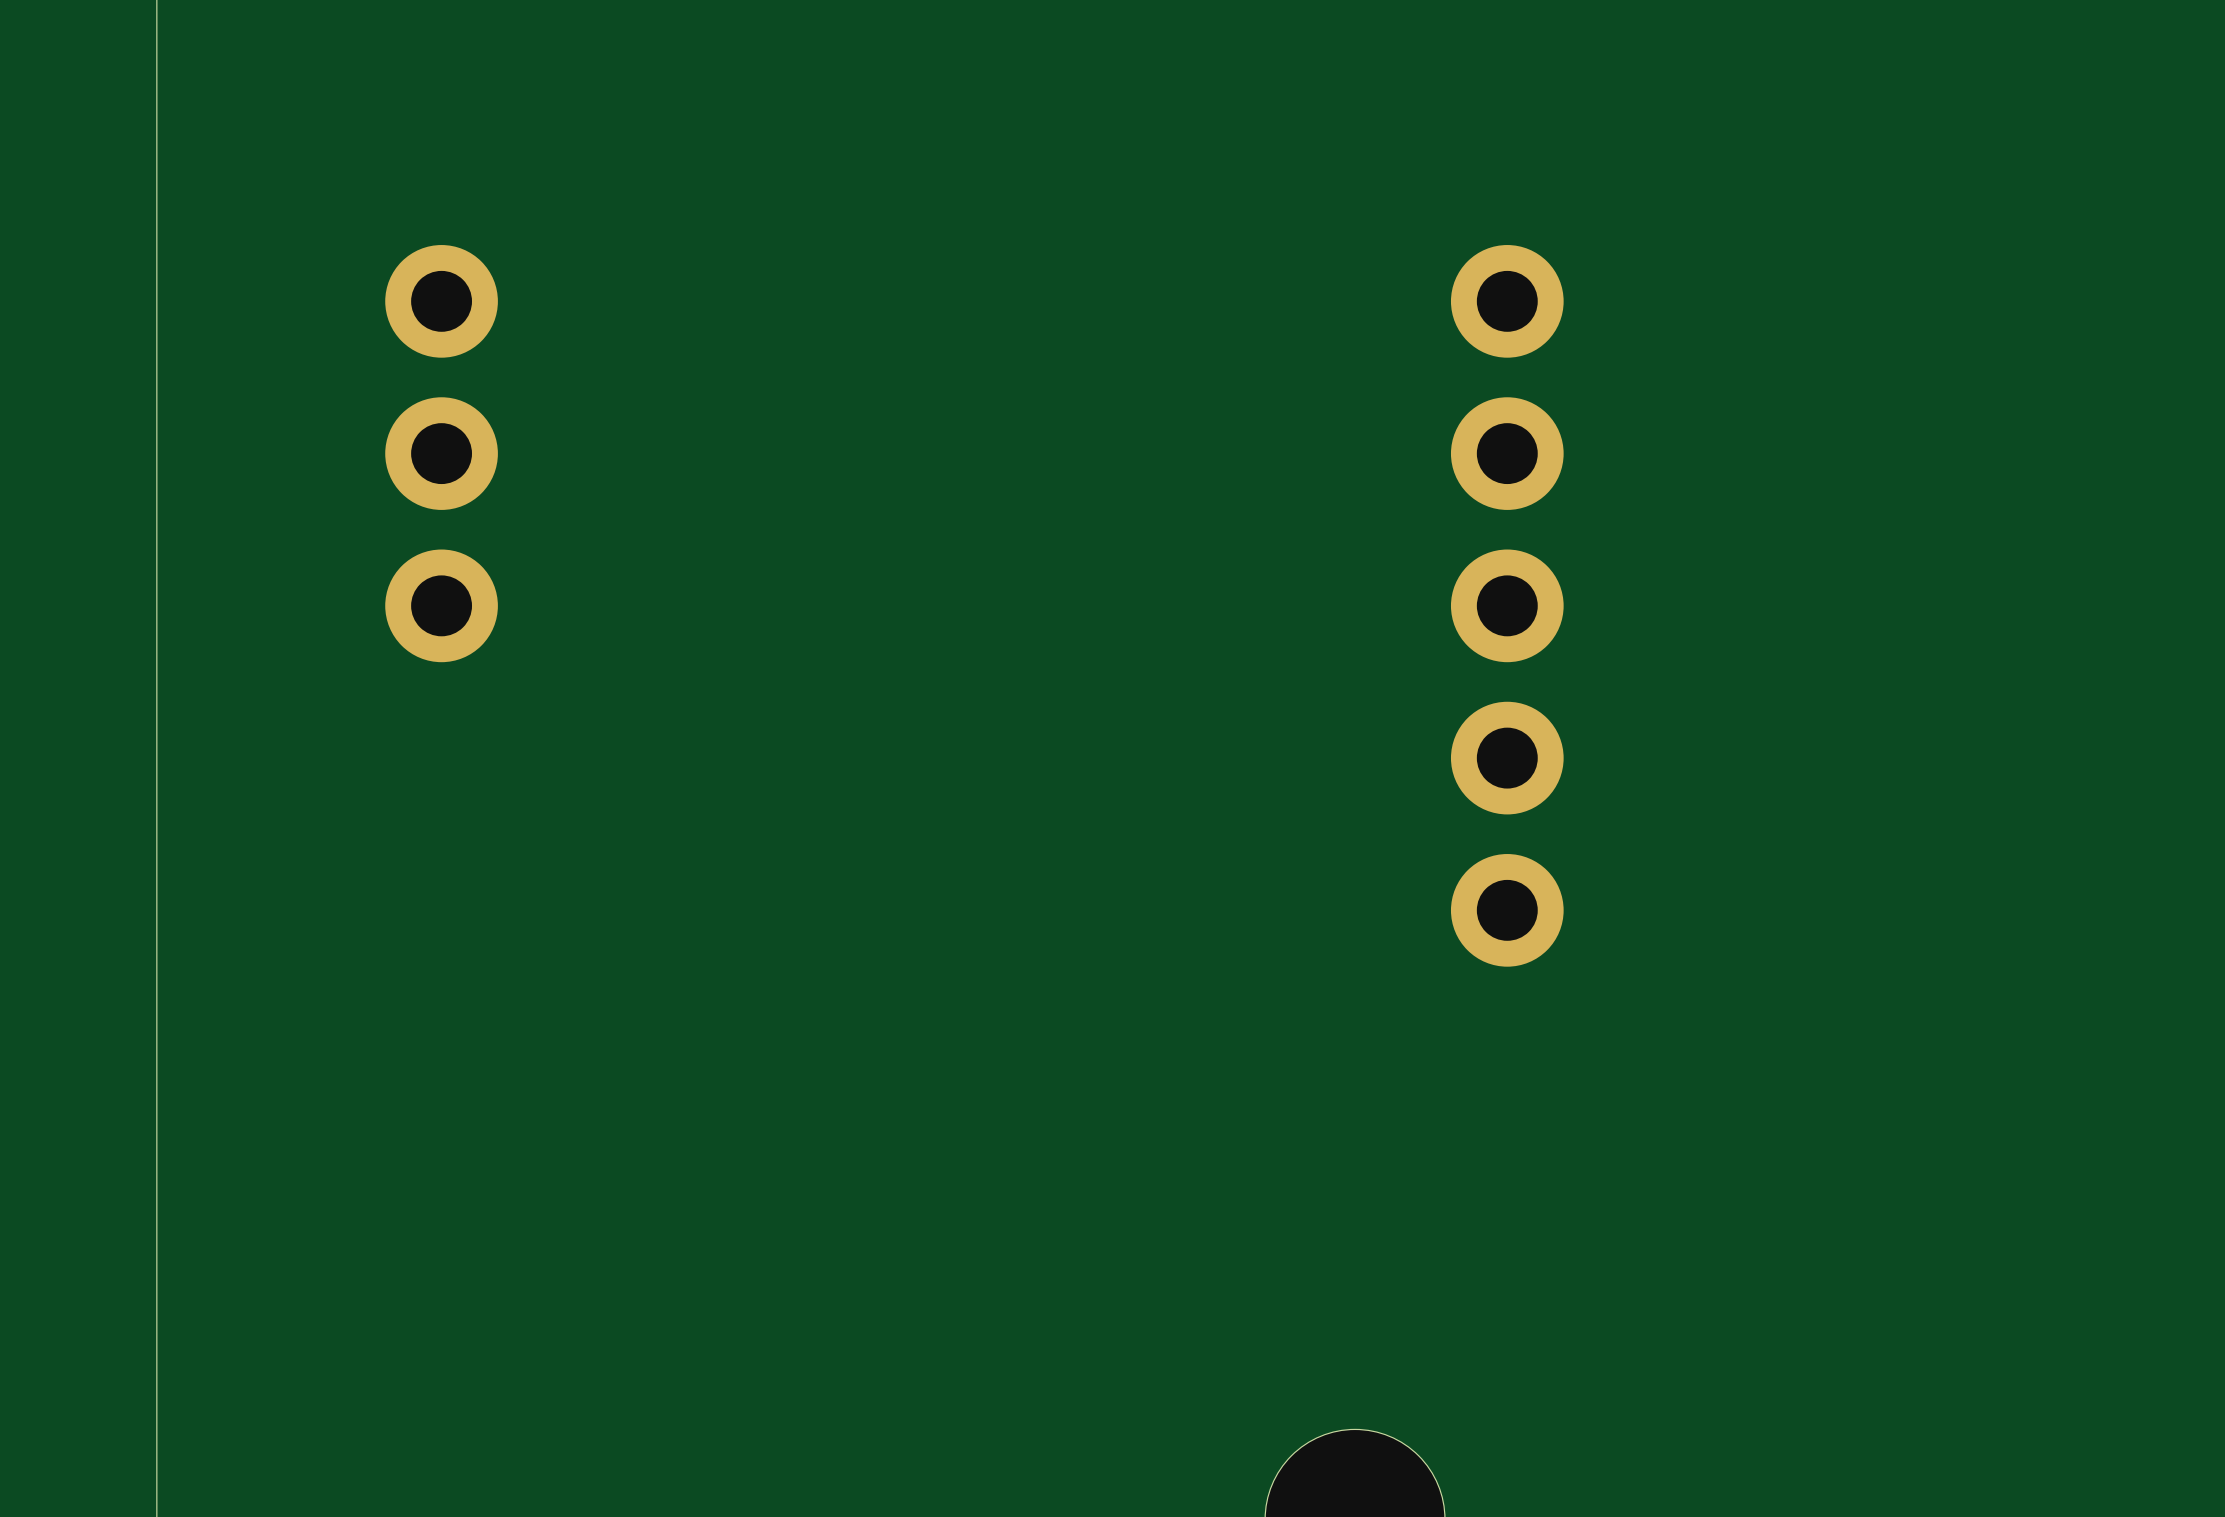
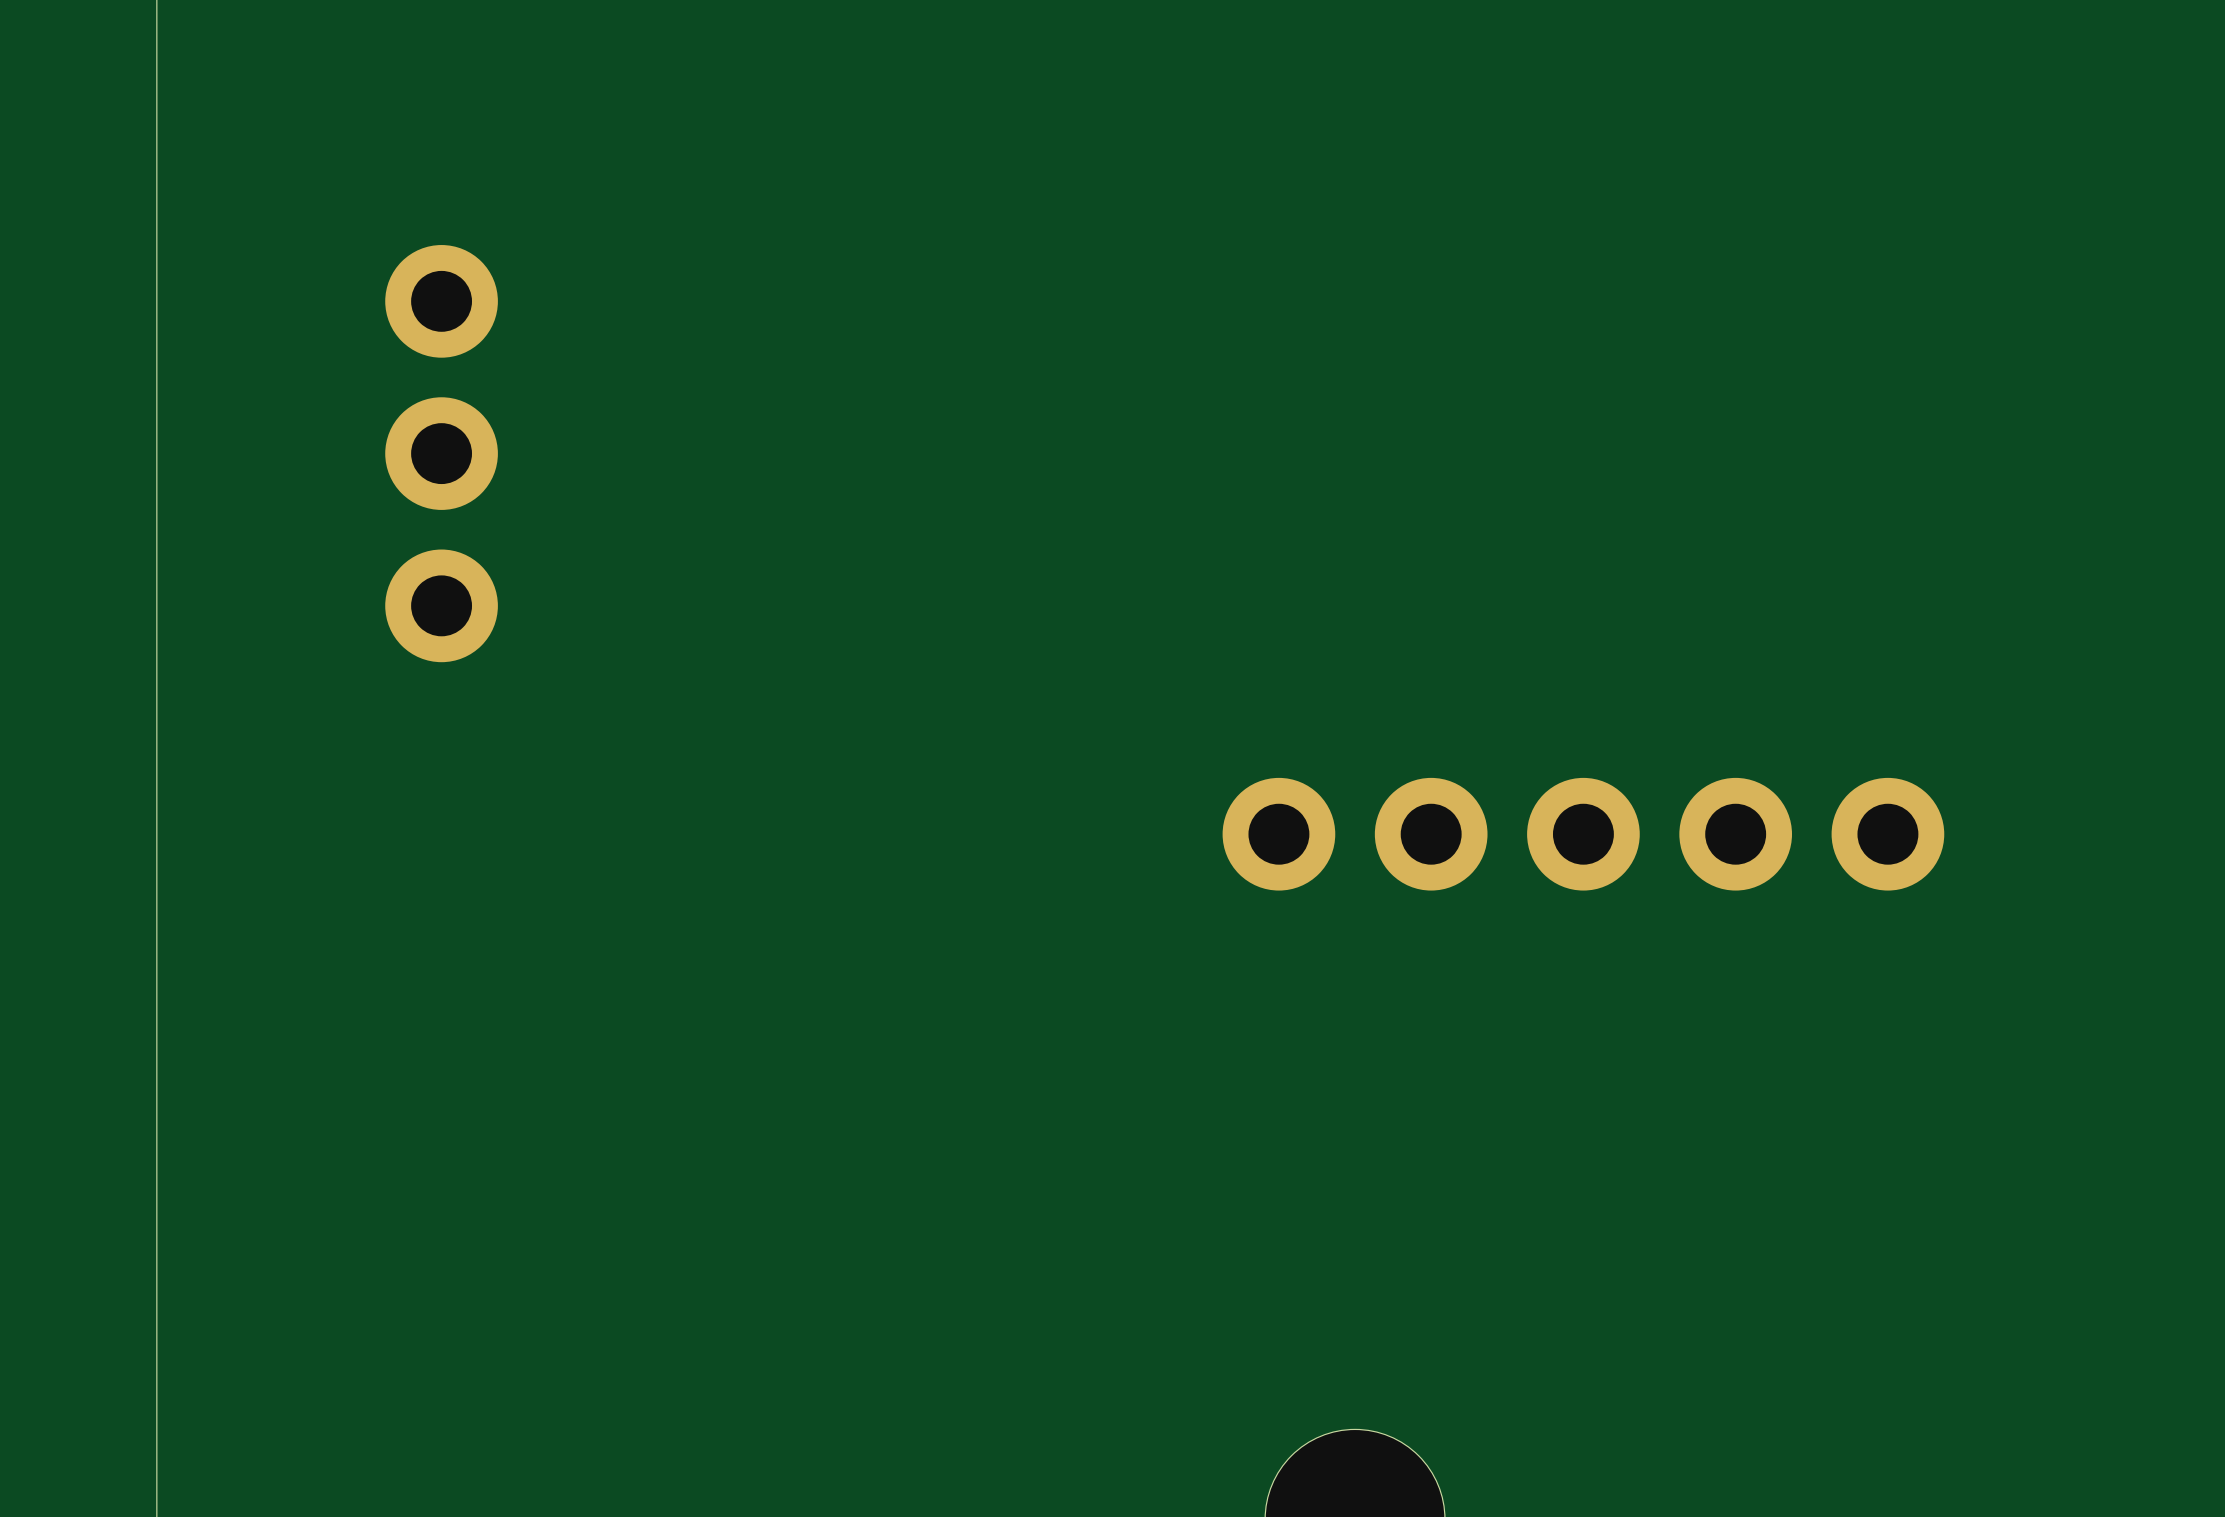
part rotation: 0° (1507, 605) -> 90° clockwise (1583, 834)

